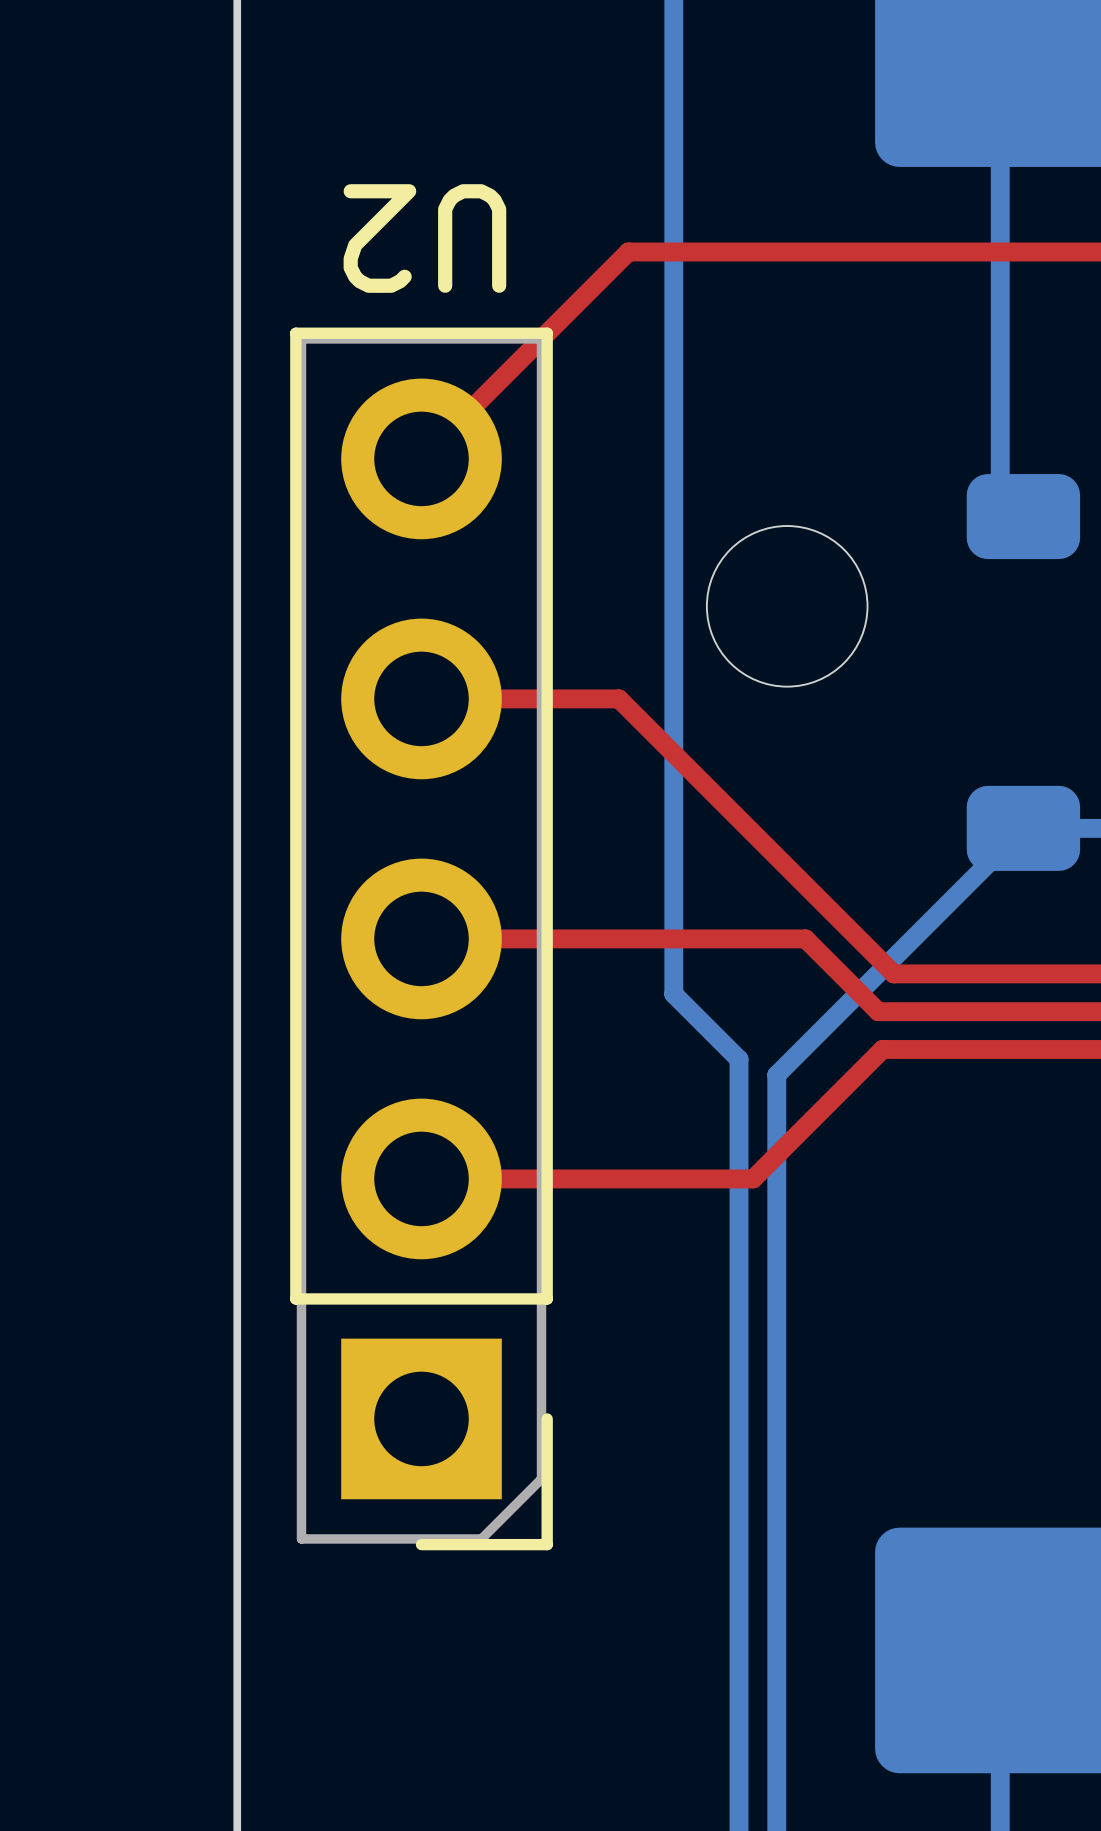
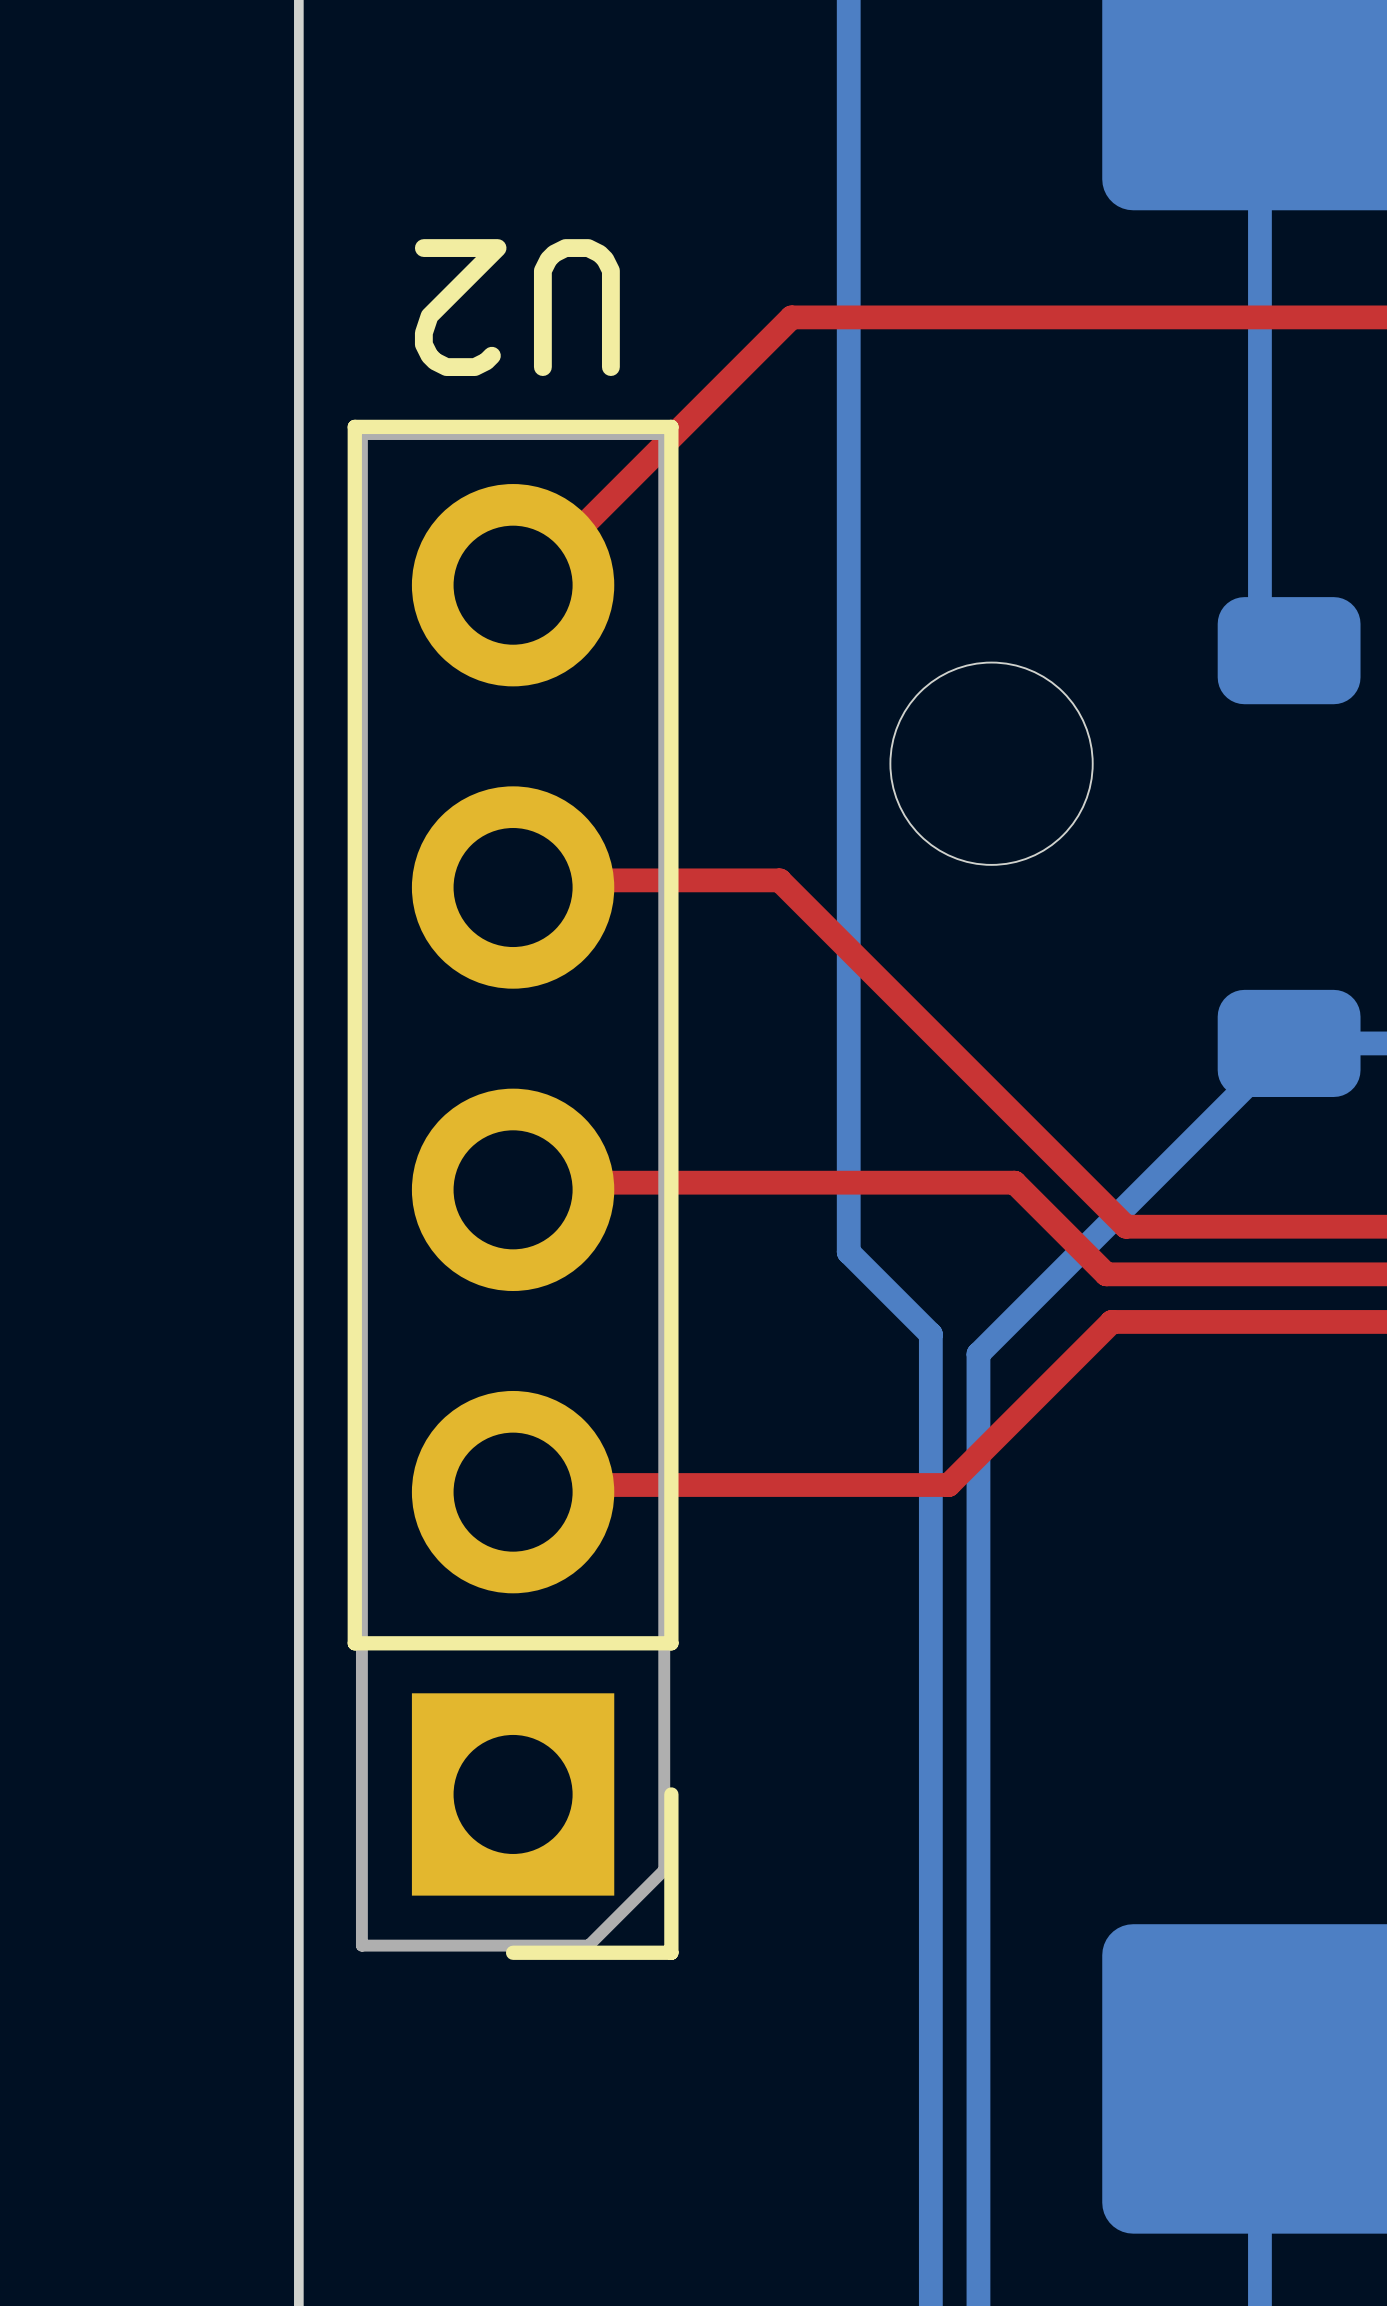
U2 position: (421, 938) -> (513, 1189)

